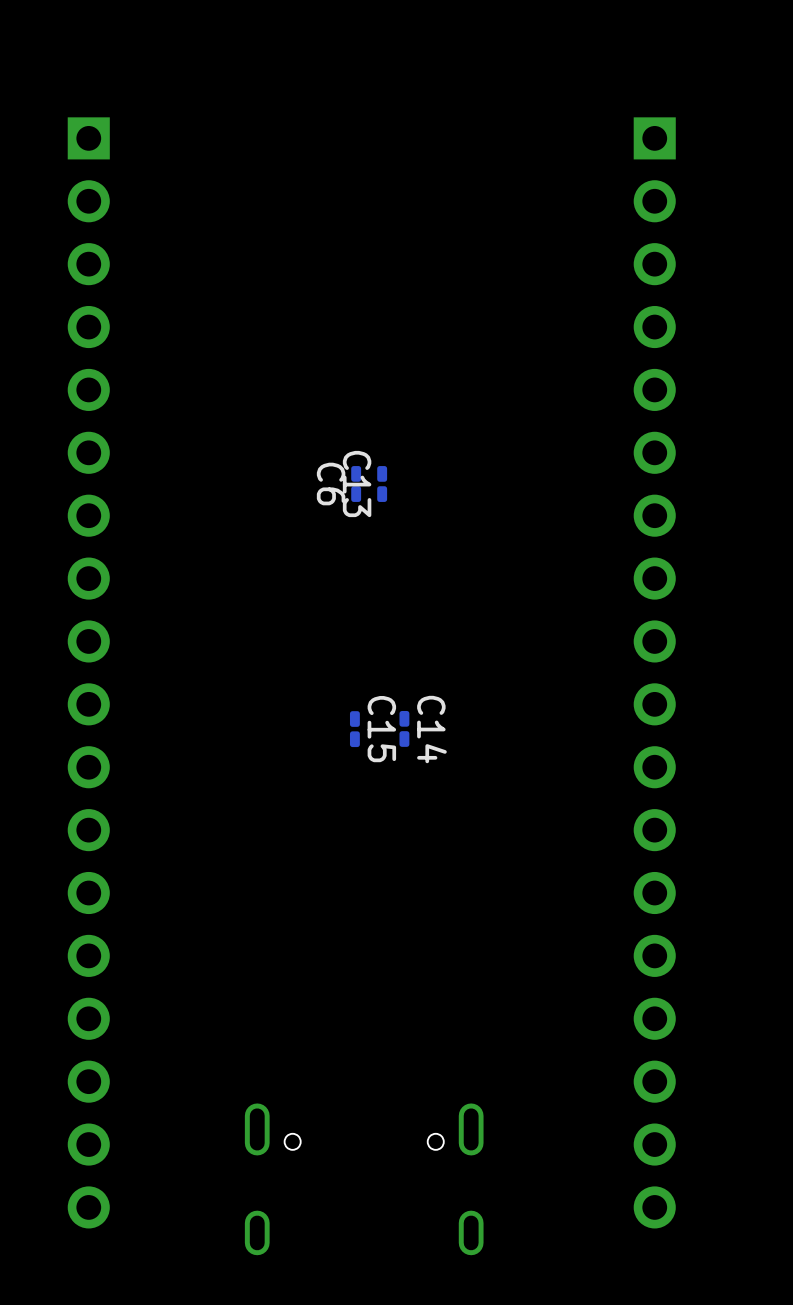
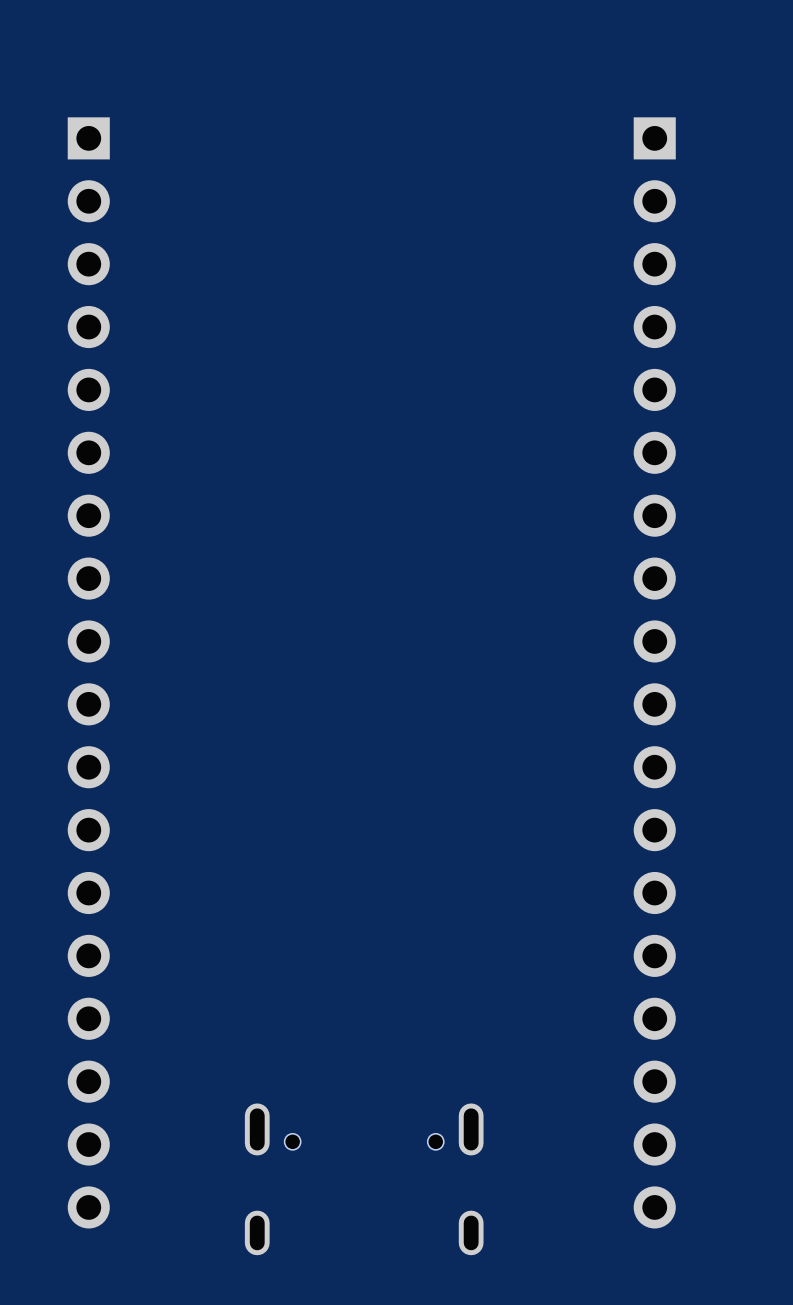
C6: (356, 484) -> none
C13: (382, 484) -> none
C14: (404, 728) -> none
C15: (354, 729) -> none

